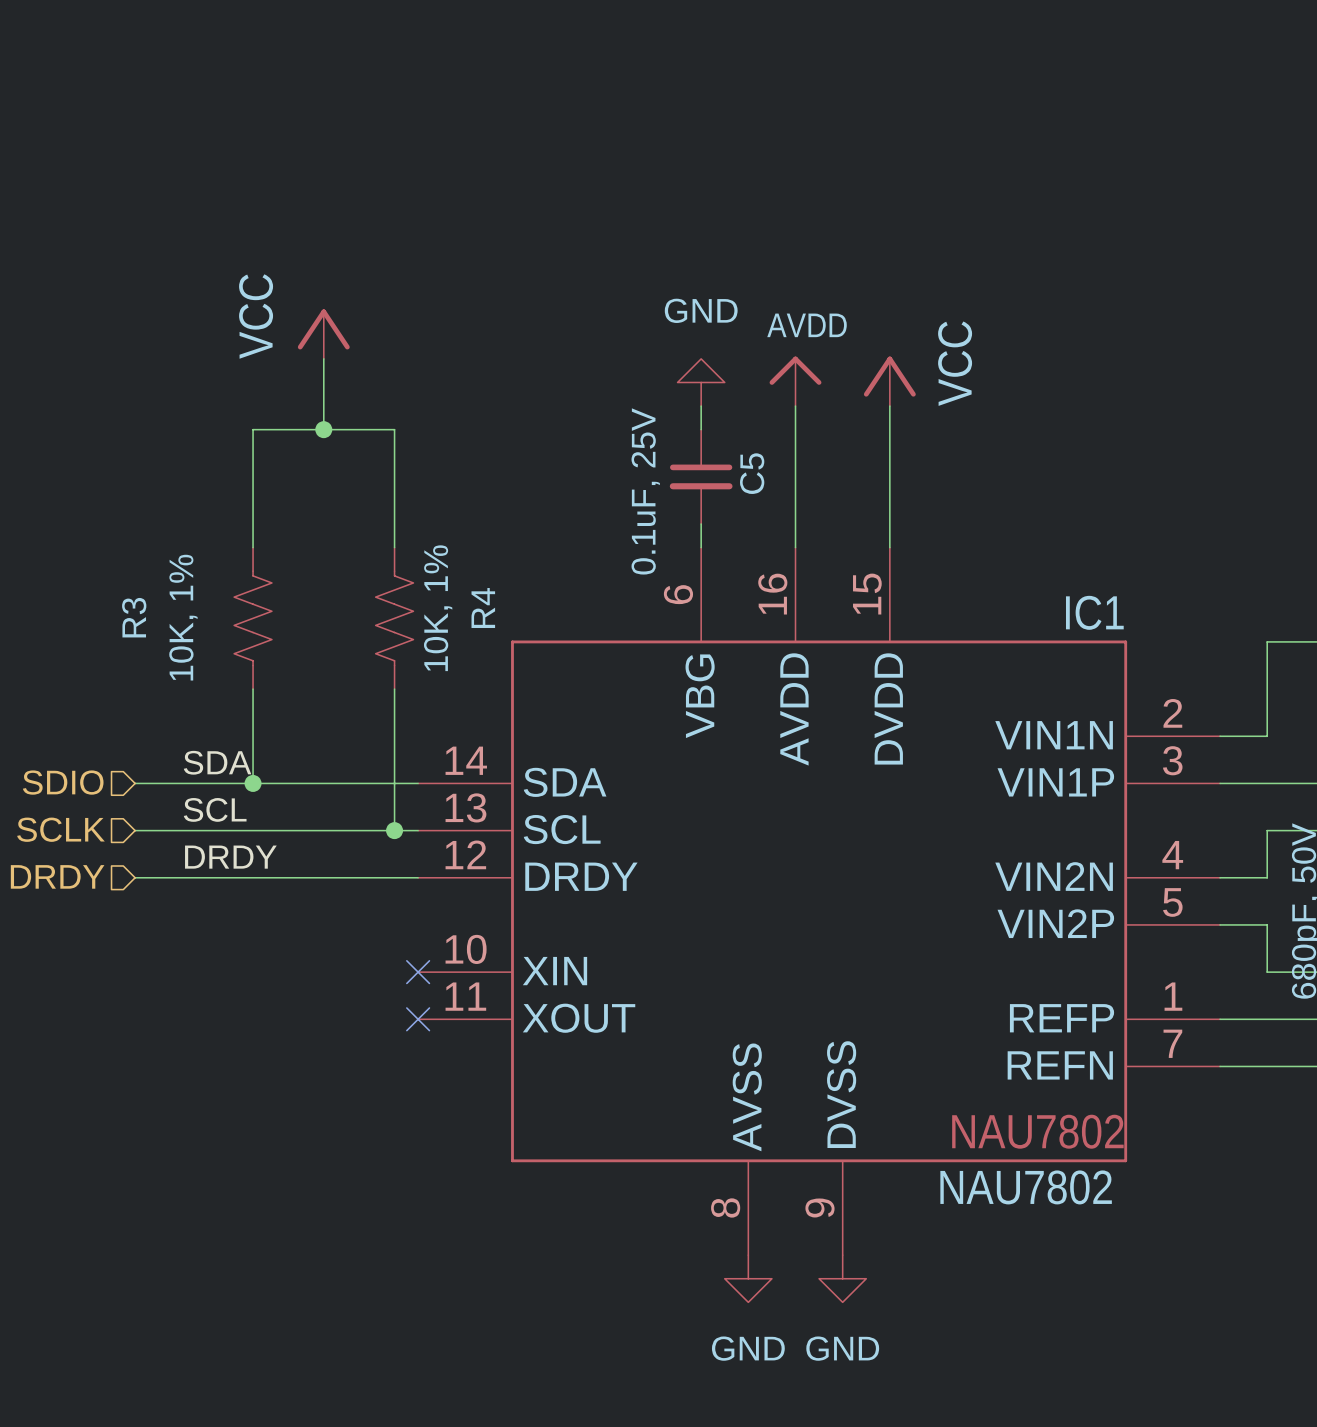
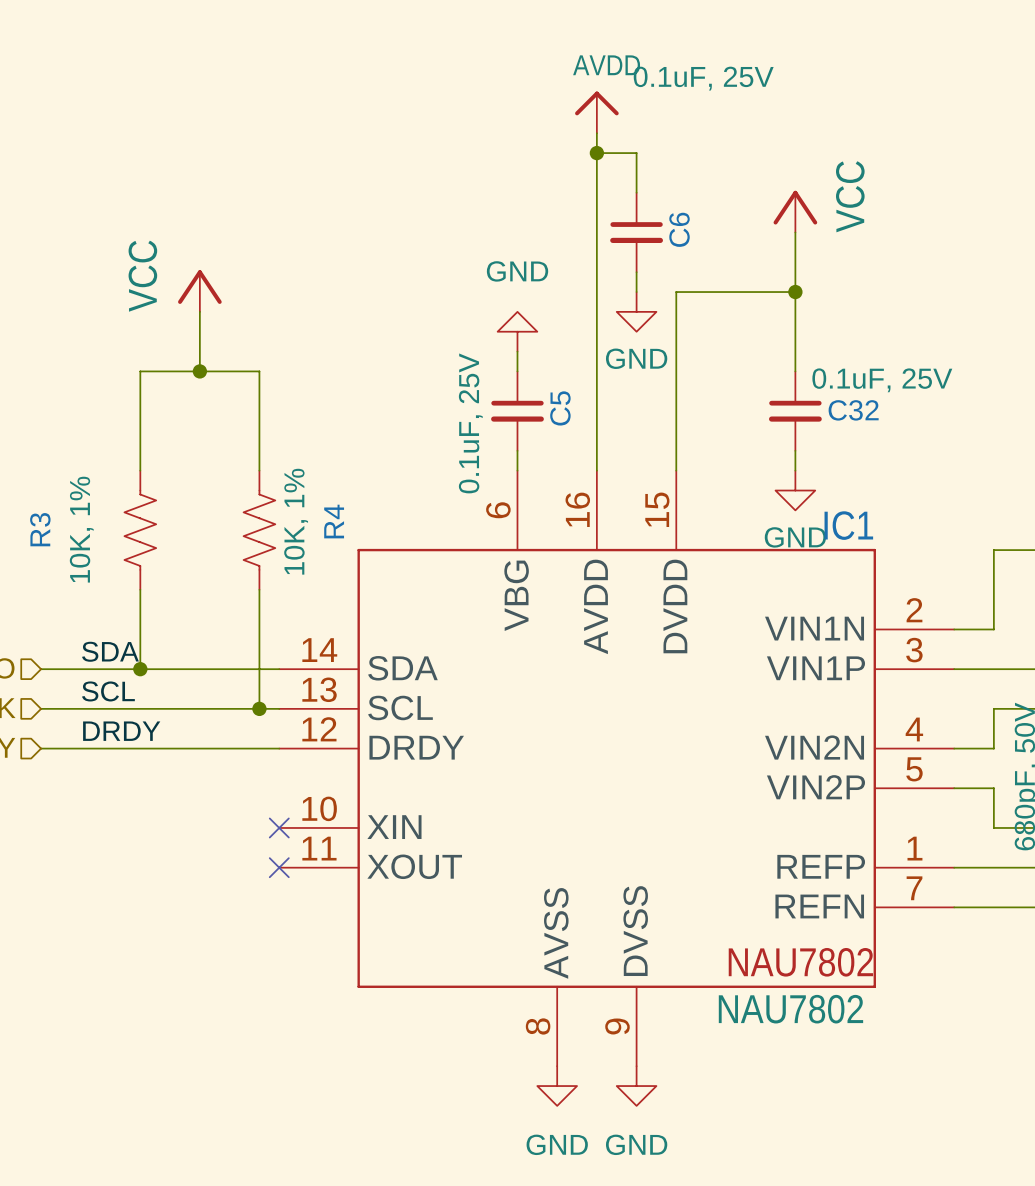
wire: none -> (596, 133) (596, 351)
wire: none -> (596, 153) (636, 153) (636, 192)
junction: none -> (596, 153)
C6: none -> 0.1uF, 25V (636, 232)
wire: none -> (795, 232) (795, 371)
wire: none -> (636, 272) (636, 292)
wire: none -> (795, 292) (676, 292) (676, 351)
junction: none -> (795, 292)
power symbol: none -> GND (636, 311)
power symbol position: AVDD (795, 381) -> AVDD (596, 112)
power symbol position: VCC (889, 381) -> VCC (795, 211)
C32: none -> 0.1uF, 25V (795, 411)
wire: none -> (795, 450) (795, 470)
power symbol: none -> GND (795, 490)

